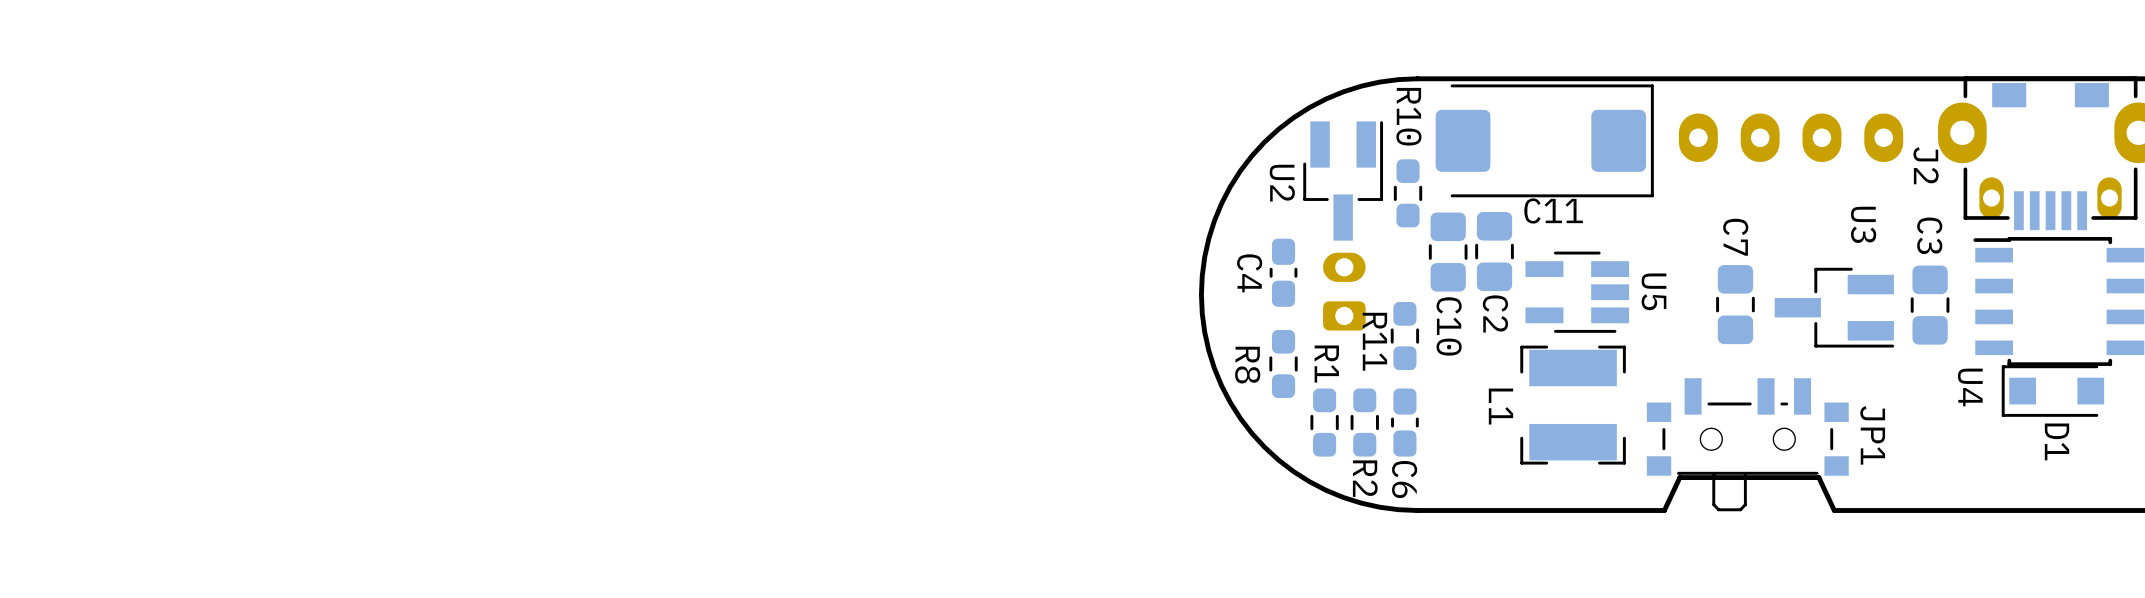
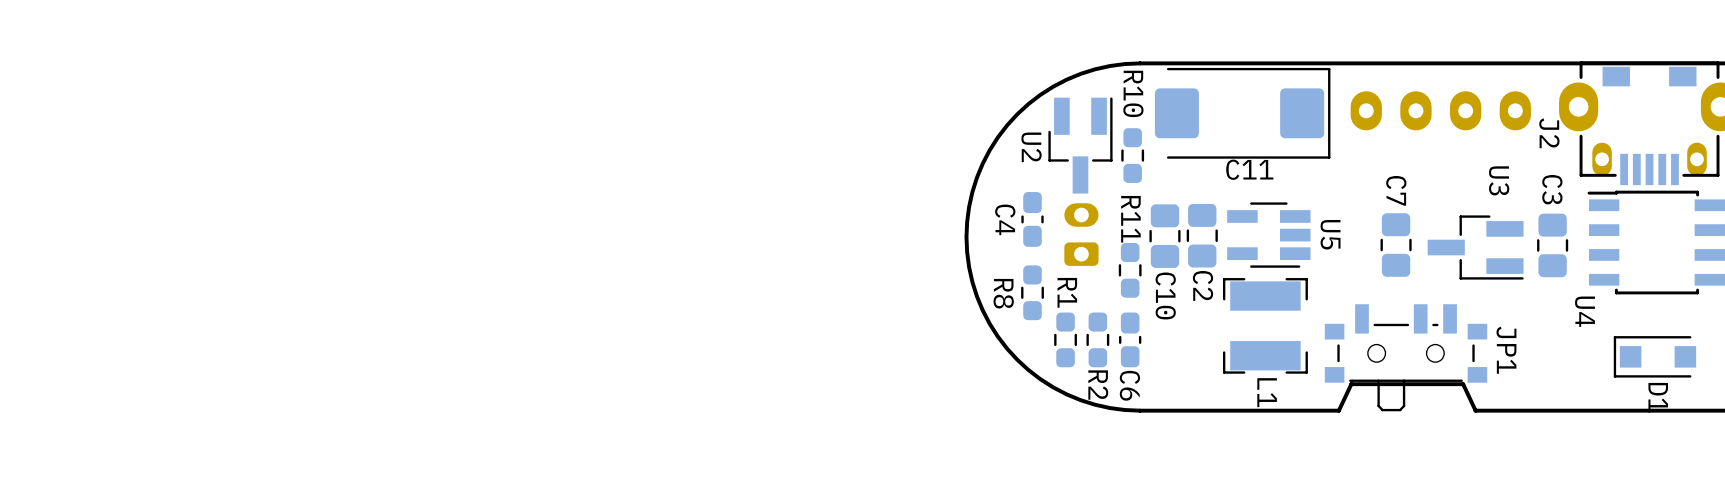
C2 position: (1494, 251) -> (1202, 235)
C10 position: (1448, 252) -> (1164, 236)
R11 name position: R11 (1374, 341) -> R11 (1130, 219)
D1 position: (2052, 391) -> (1654, 356)
L1 name position: L1 (1500, 406) -> L1 (1267, 392)

